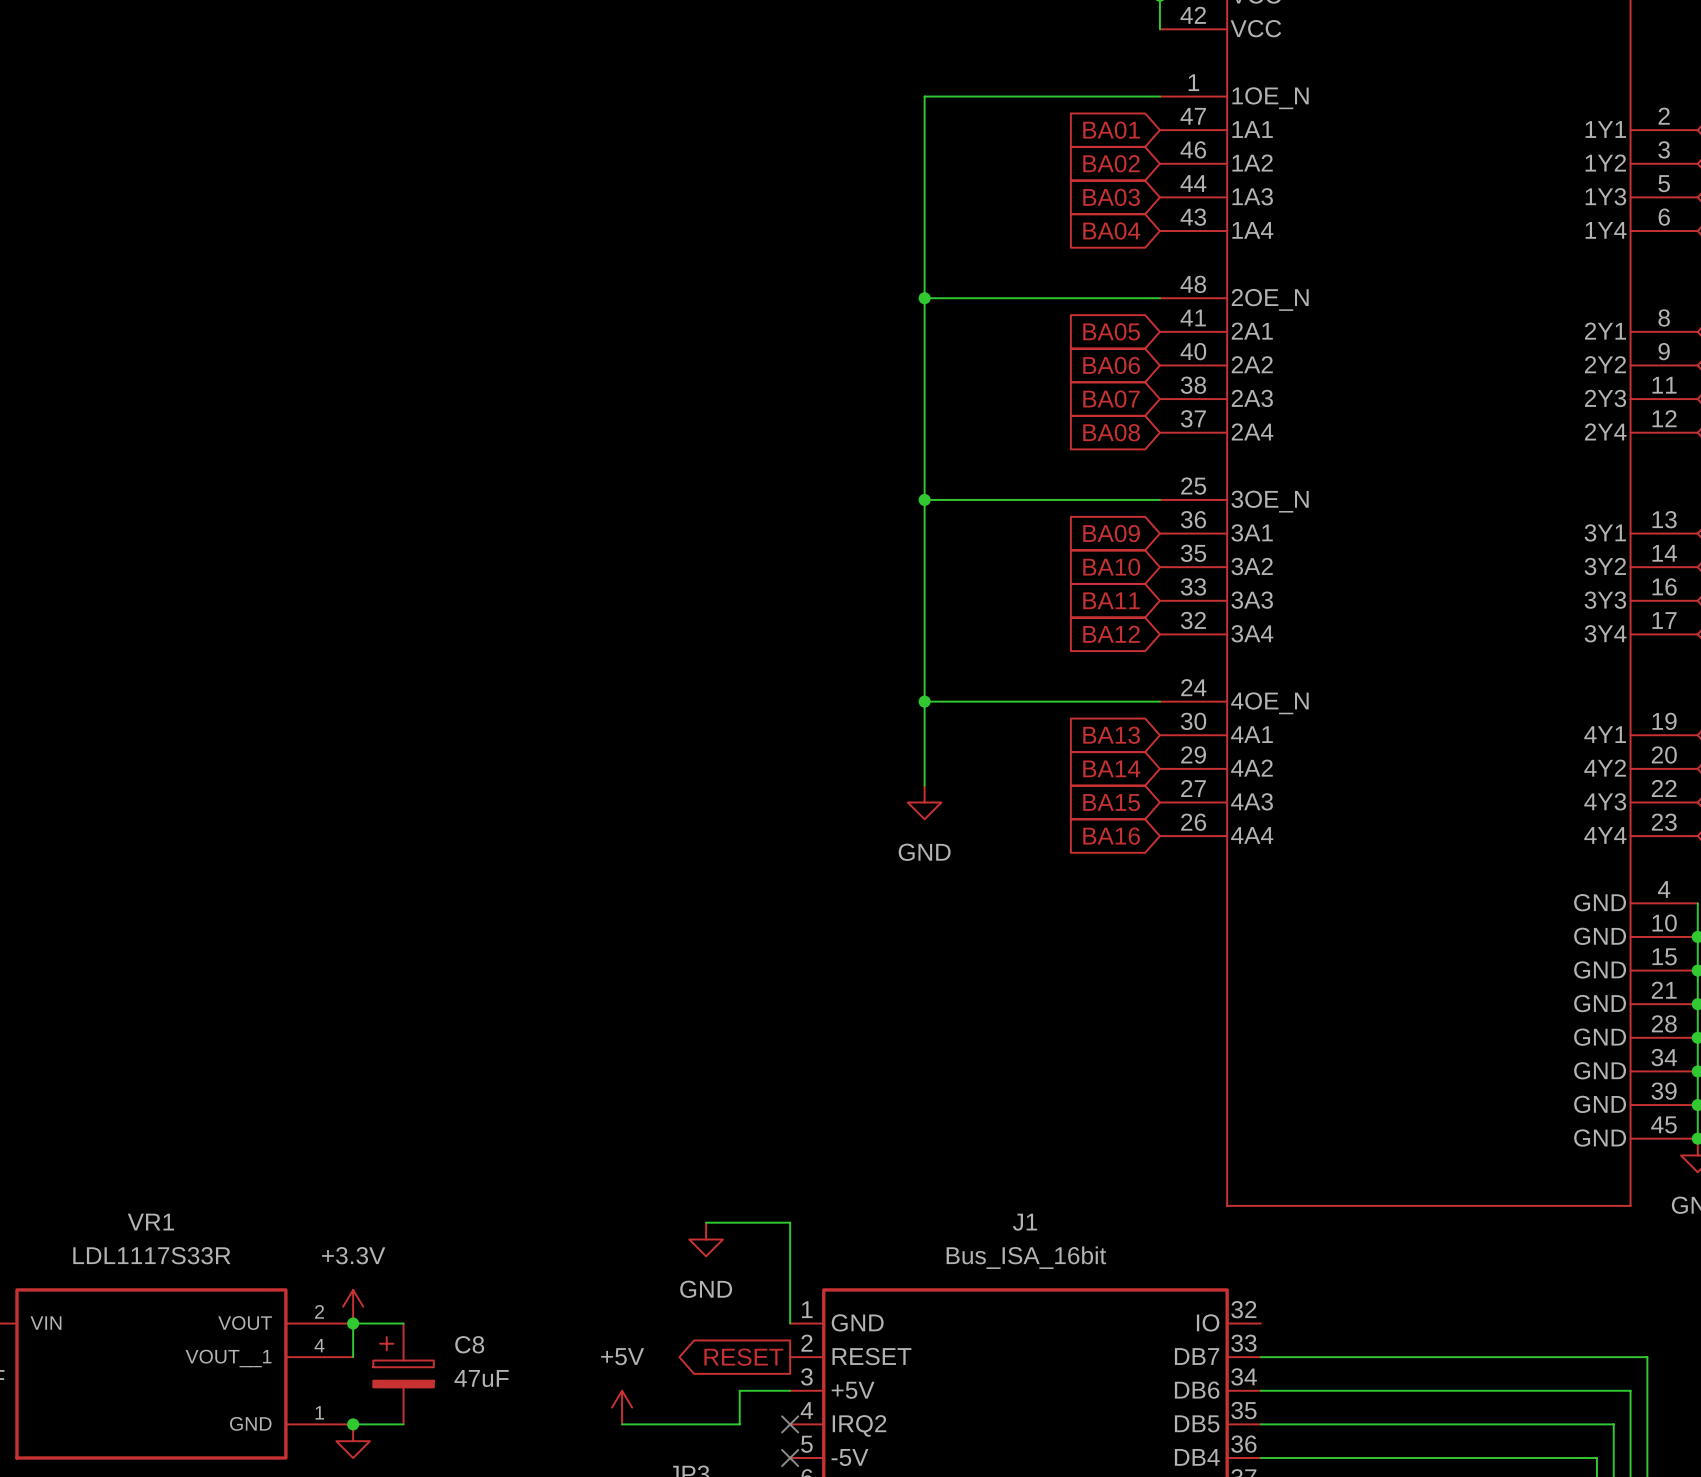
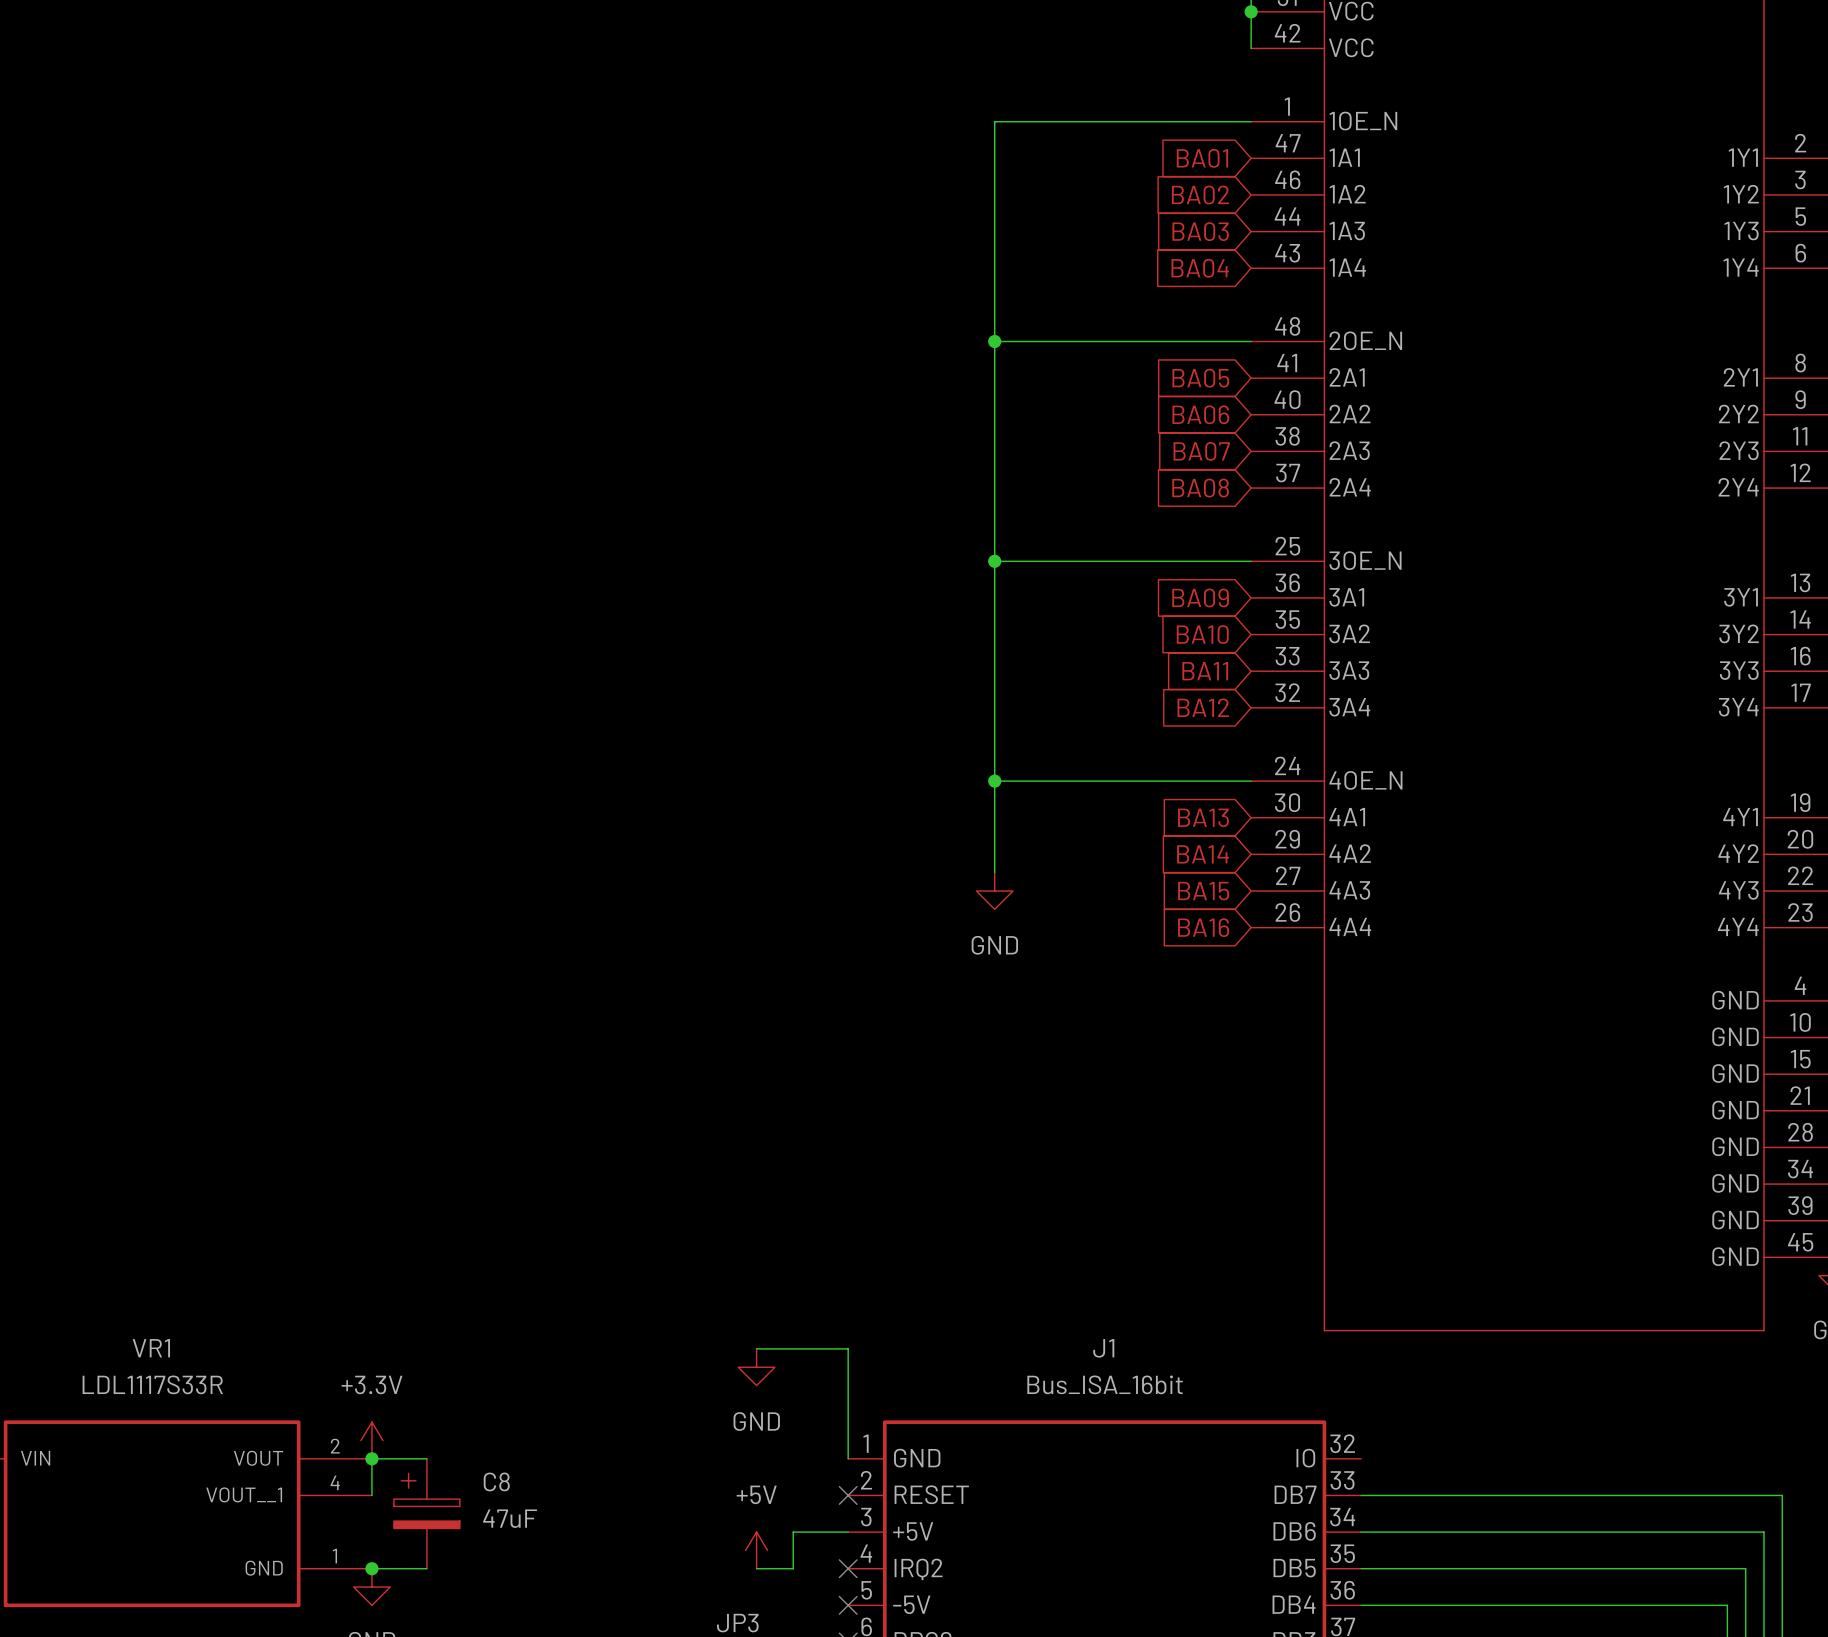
global label: RESET (743, 1357) -> none
no-connect mark: none -> (848, 1495)
power symbol position: +5V (622, 1407) -> +5V (756, 1550)
wire: (622, 1424) (706, 1424) -> none

